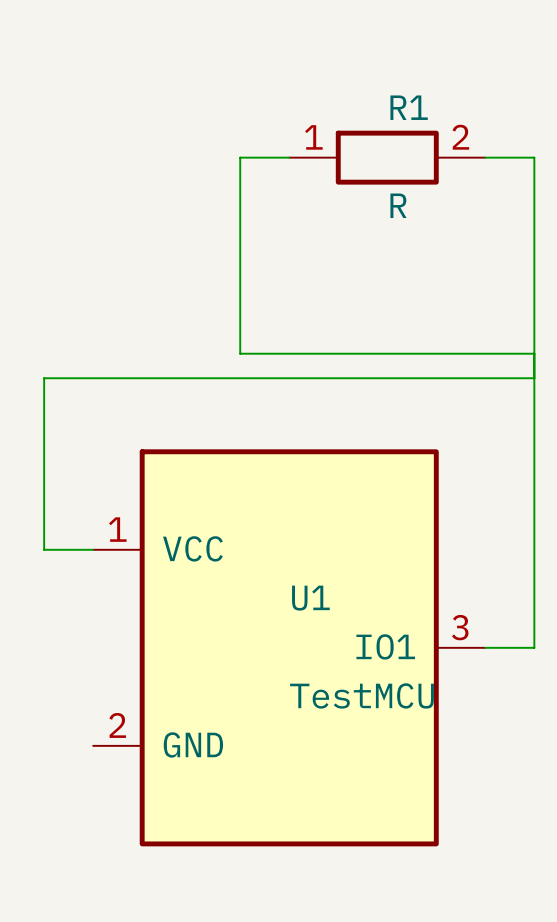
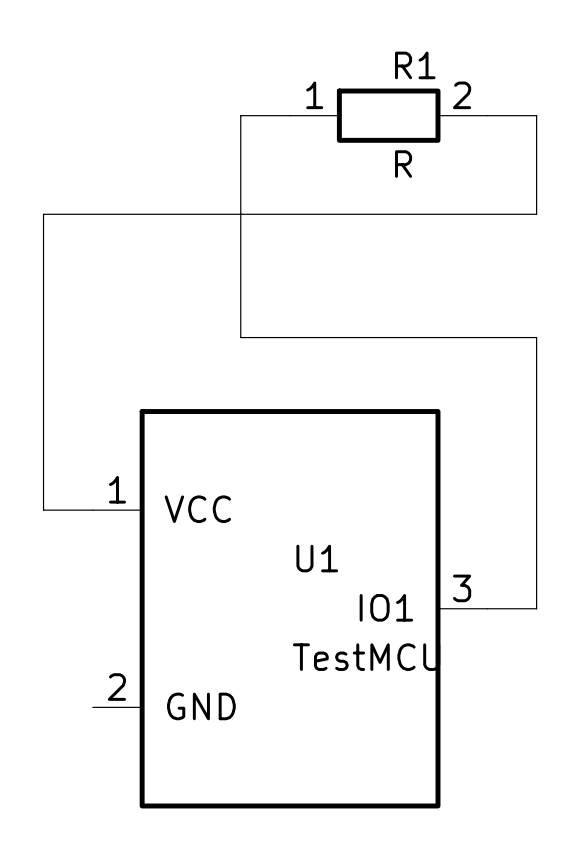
wire: (534, 255) (534, 378) -> (536, 214) (43, 214) (43, 337)
wire: (240, 353) (534, 353) -> none
wire: (44, 378) (240, 378) -> (240, 312) (240, 337)

